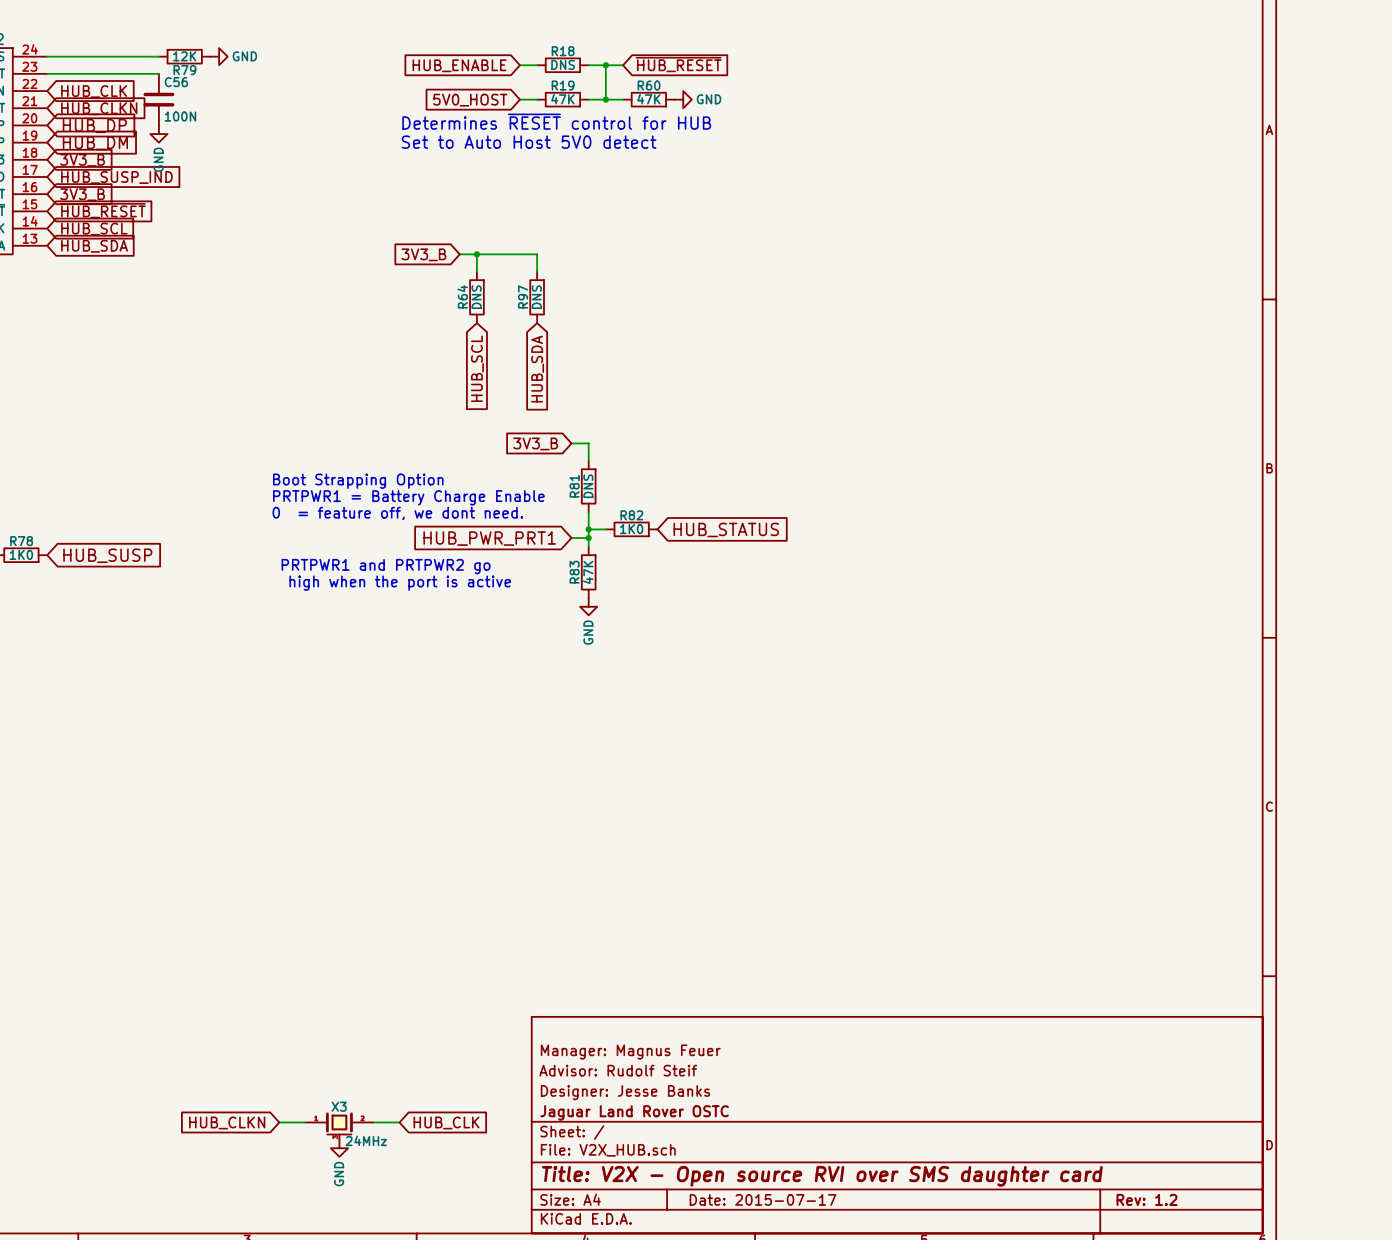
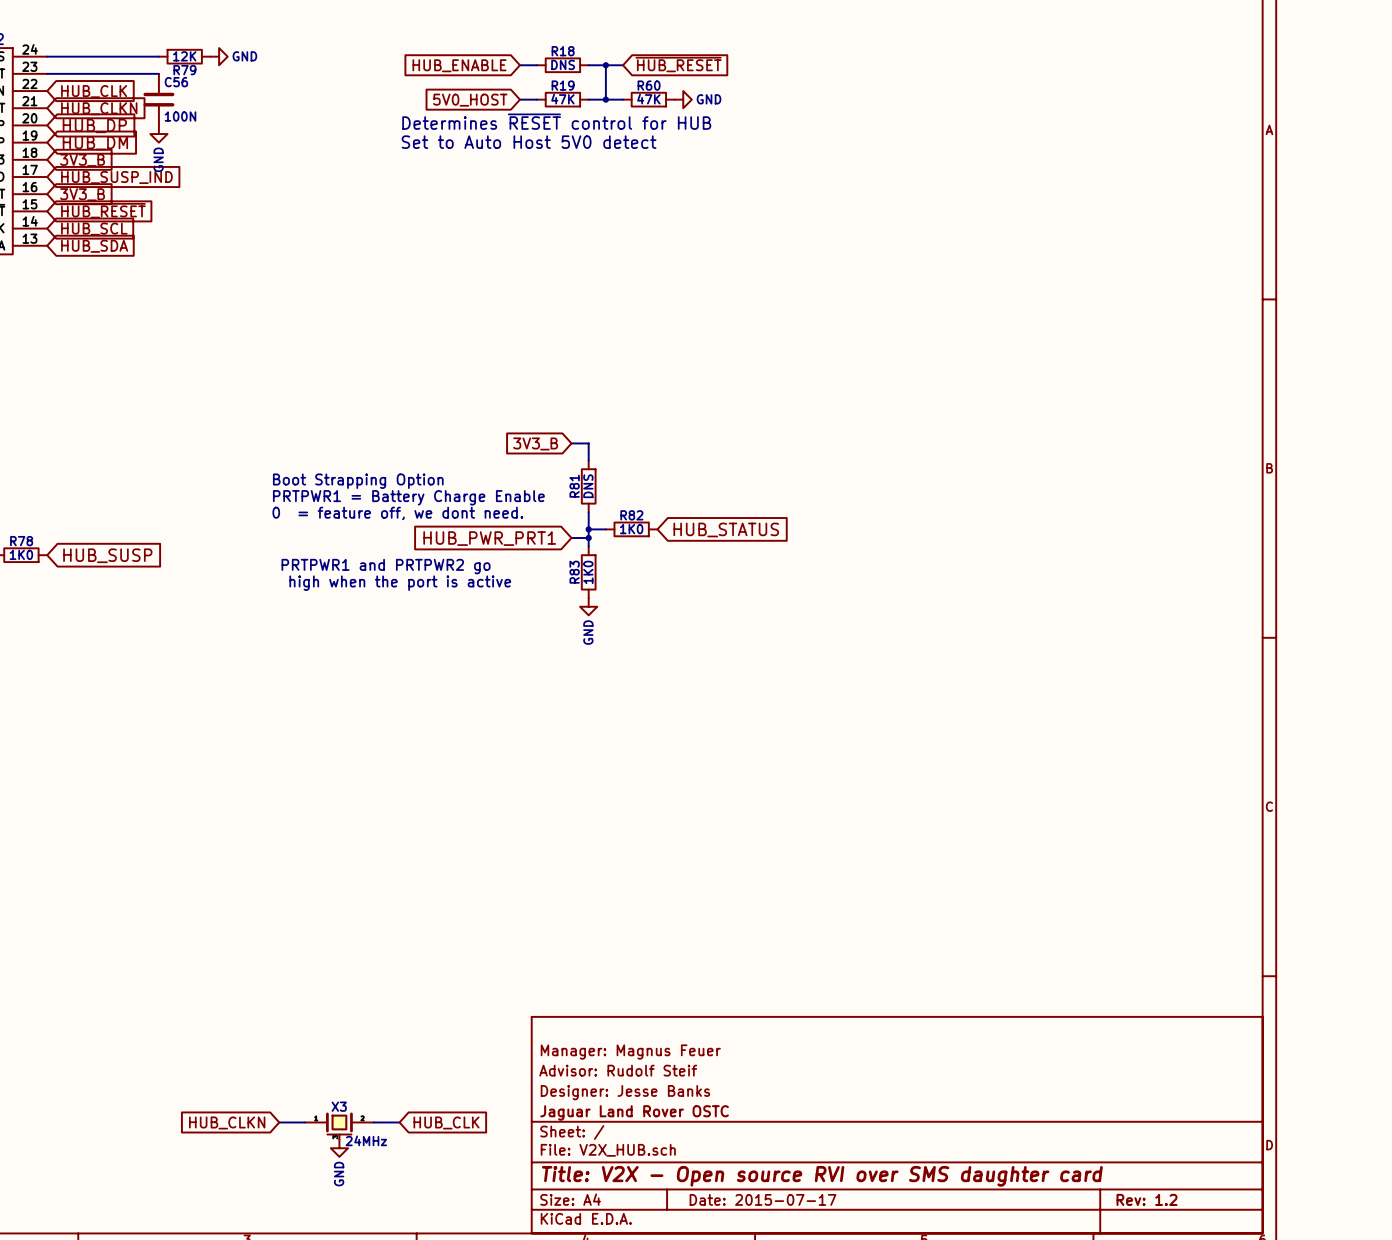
global label: 3V3_B (423, 254) -> none
wire: (459, 254) (537, 254) (537, 271) -> none
wire: (476, 254) (476, 271) -> none
junction: (476, 254) -> none
R64: DNS (476, 297) -> none
R97: DNS (537, 297) -> none
global label: HUB_SCL (477, 368) -> none
global label: HUB_SDA (537, 369) -> none
R83 value: 47K (588, 572) -> 1K0 (588, 572)

